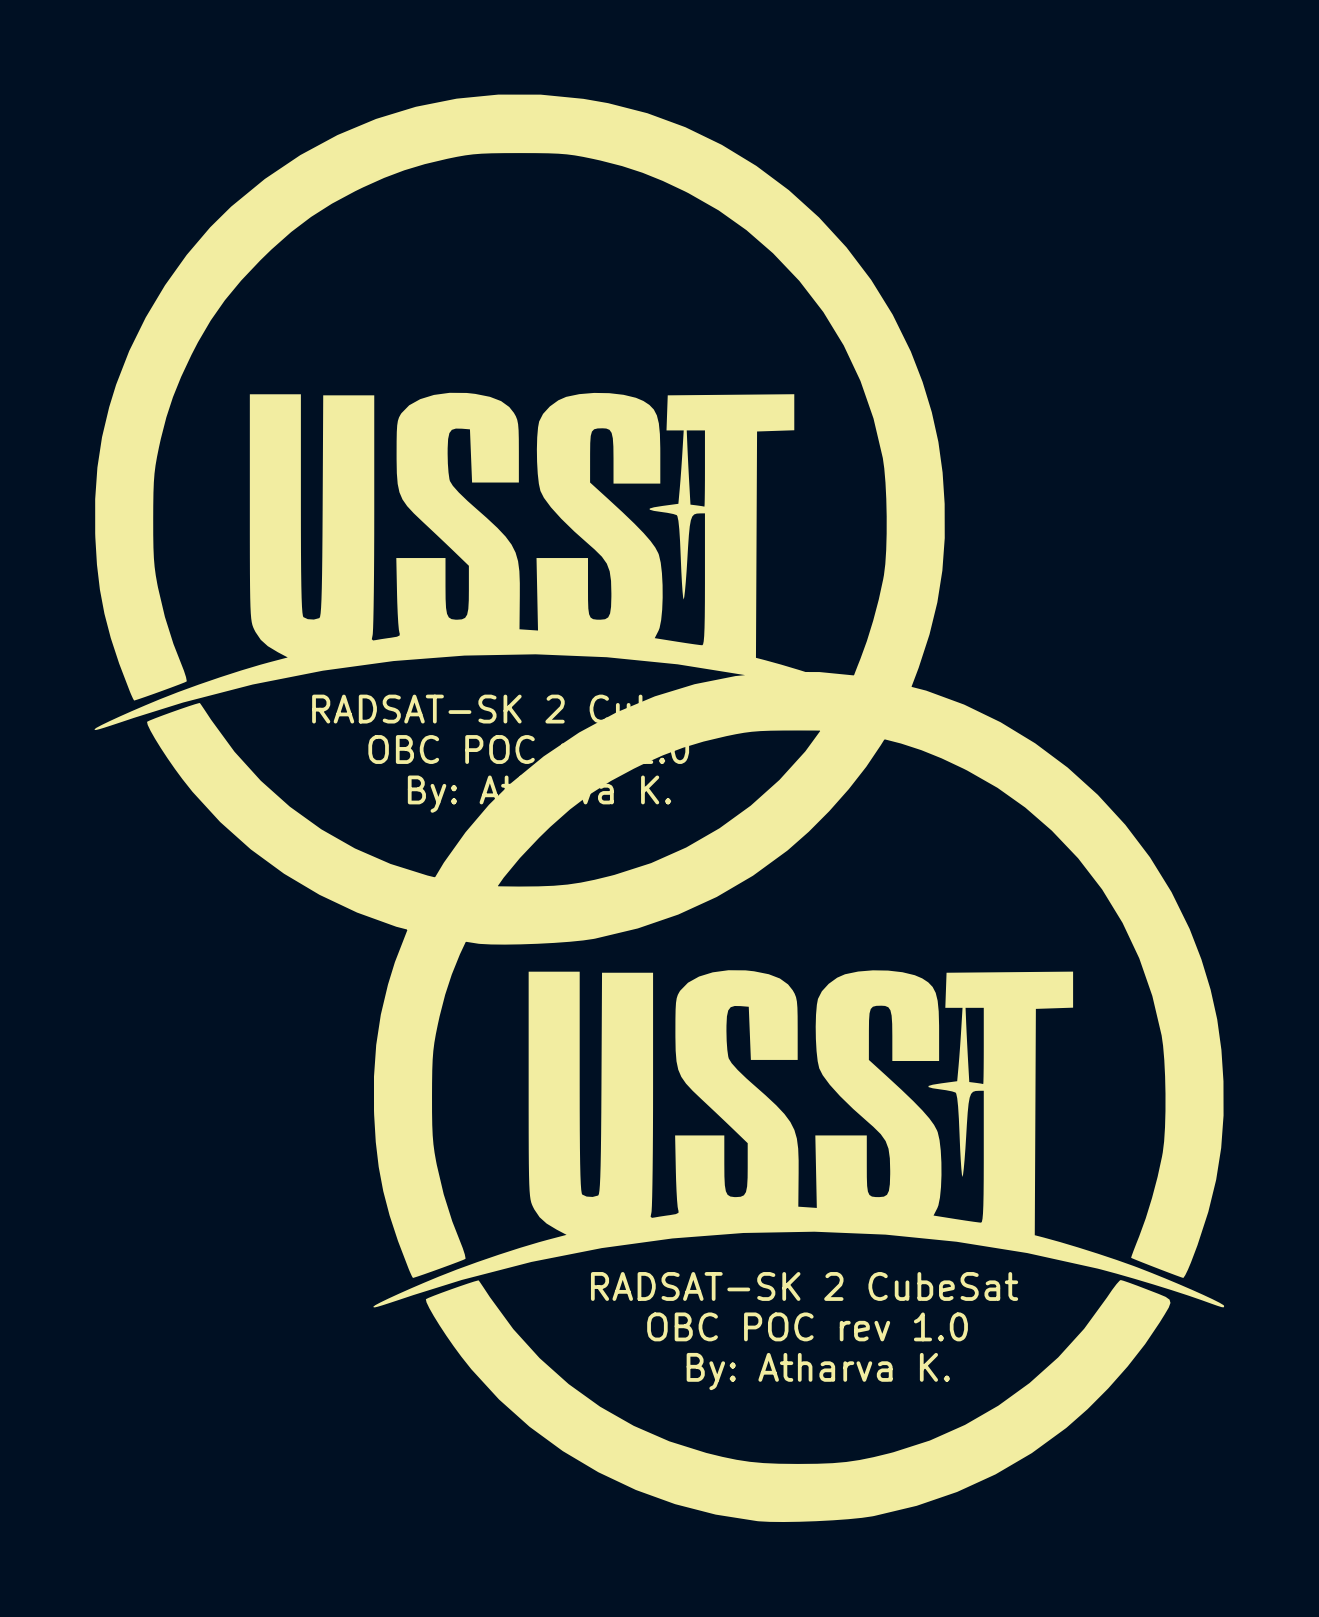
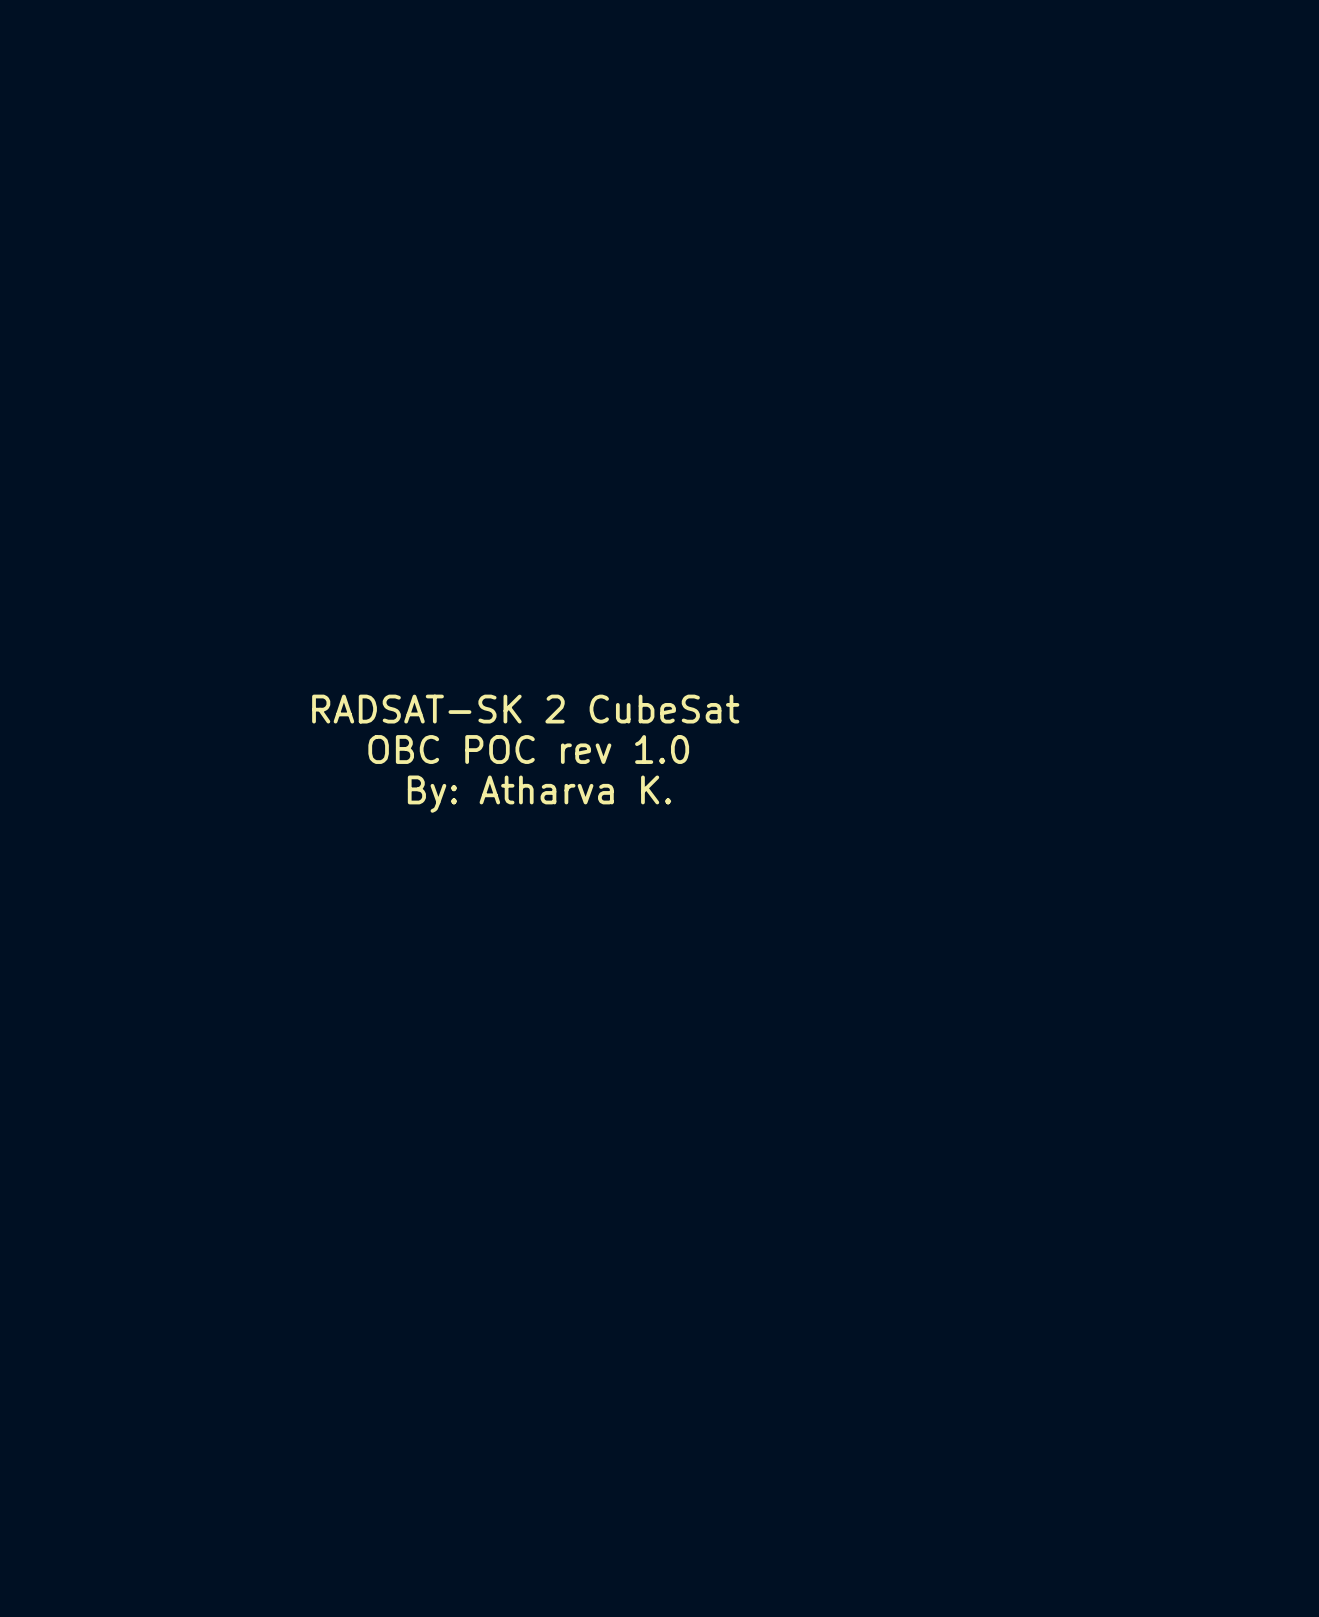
drawing: [94, 94, 1225, 1523] -> none
text: RADSAT-SK 2 CubeSat (804, 1286) -> none
text: OBC POC rev 1.0 (807, 1326) -> none
text: By: Atharva K. (818, 1371) -> none

